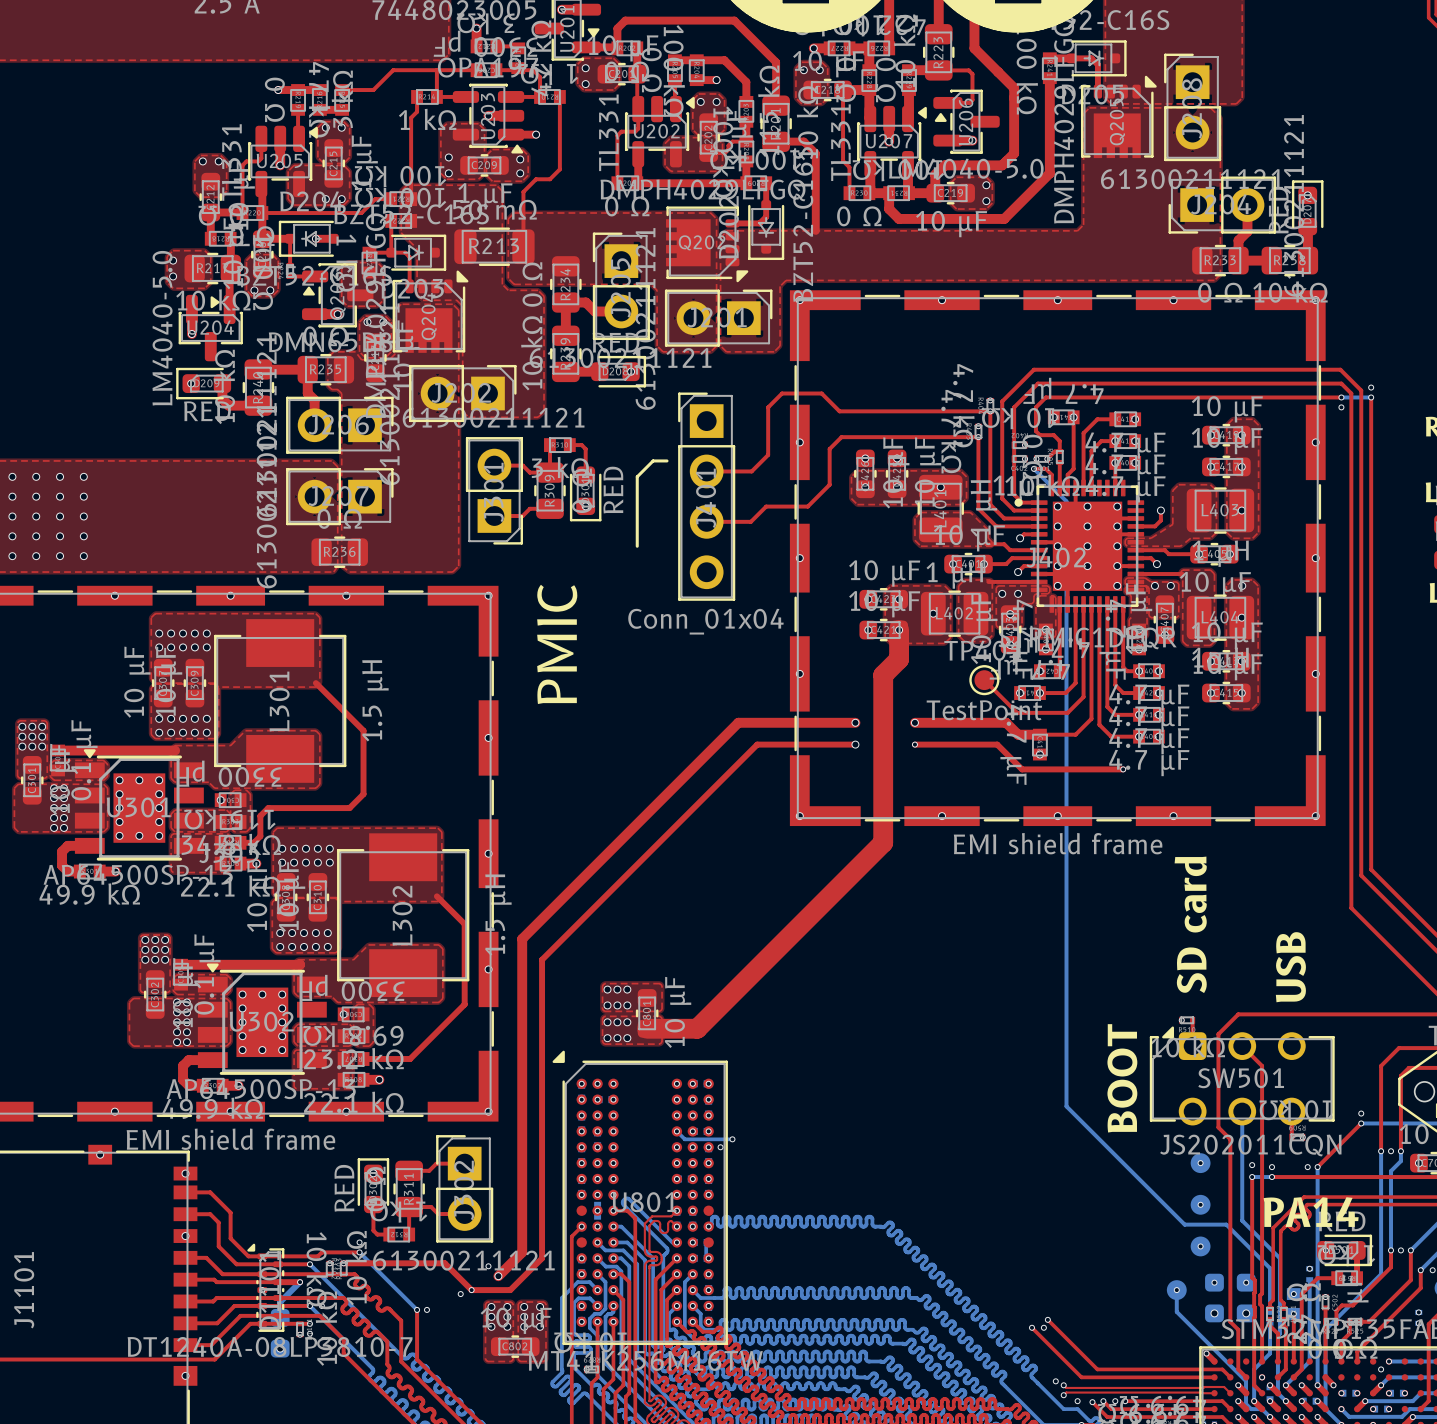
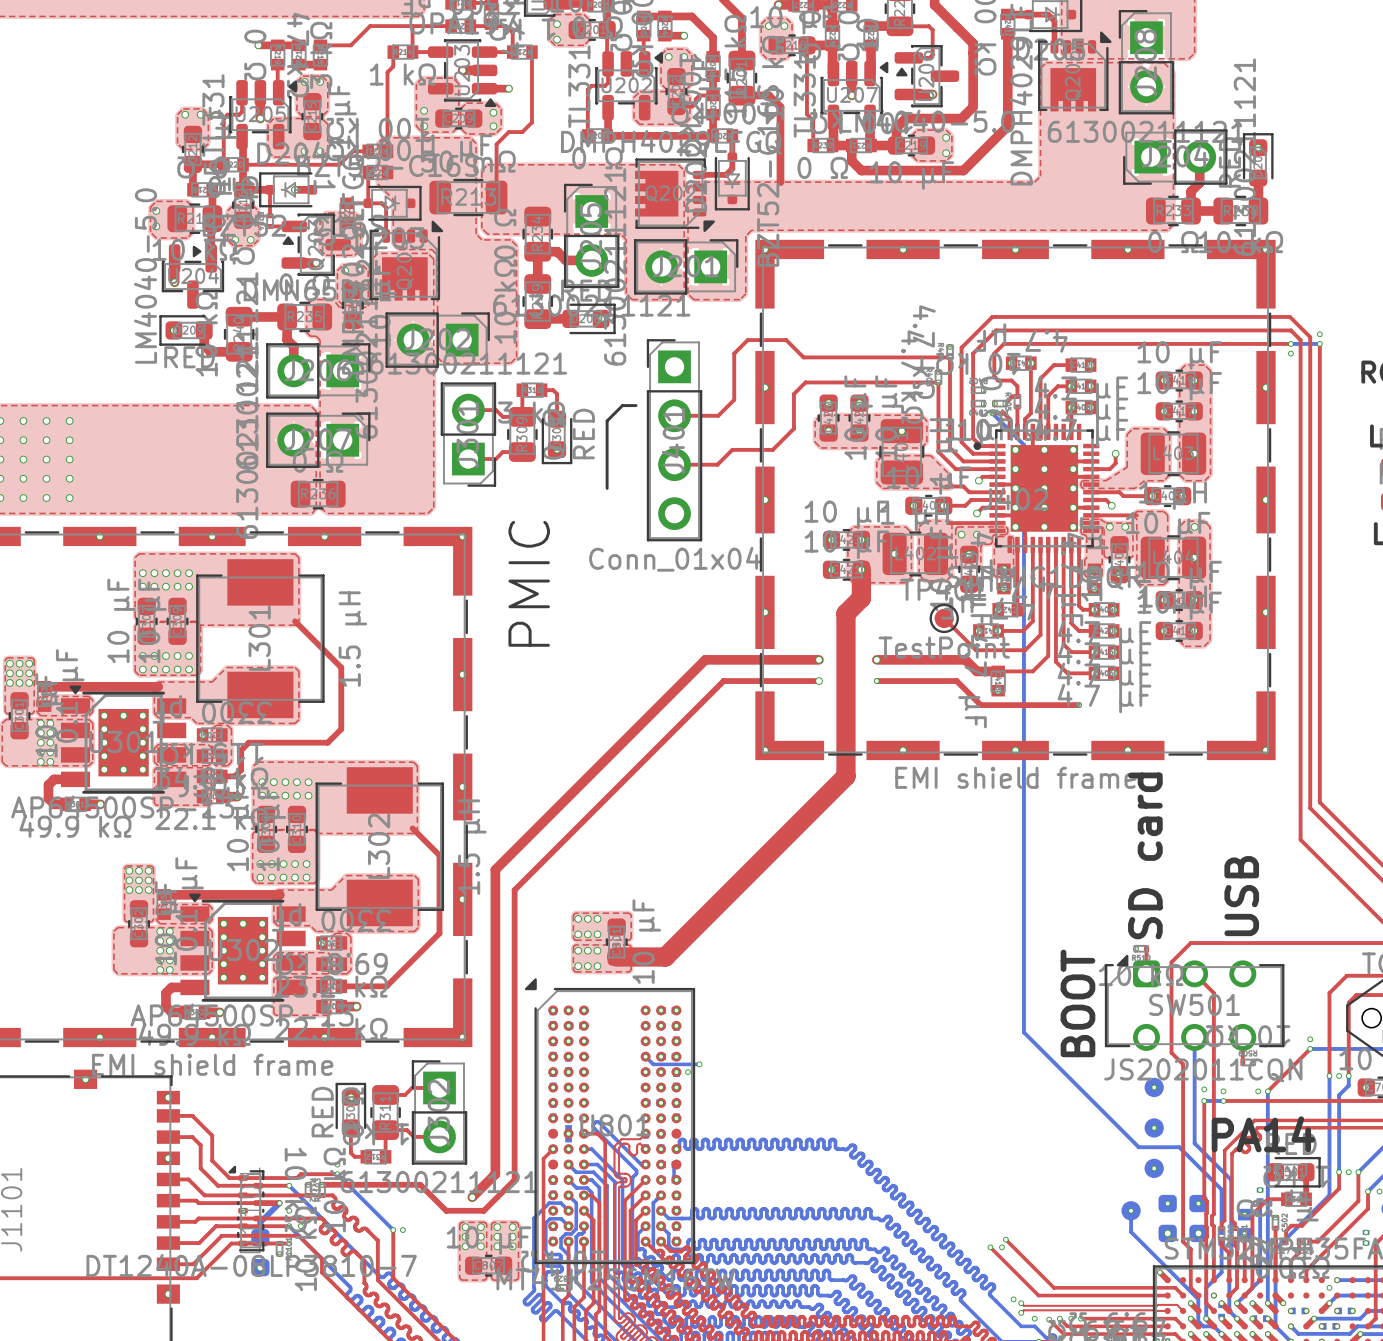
via: (488, 1266) -> none
via: (471, 1290) -> none
via: (460, 1294) -> none

